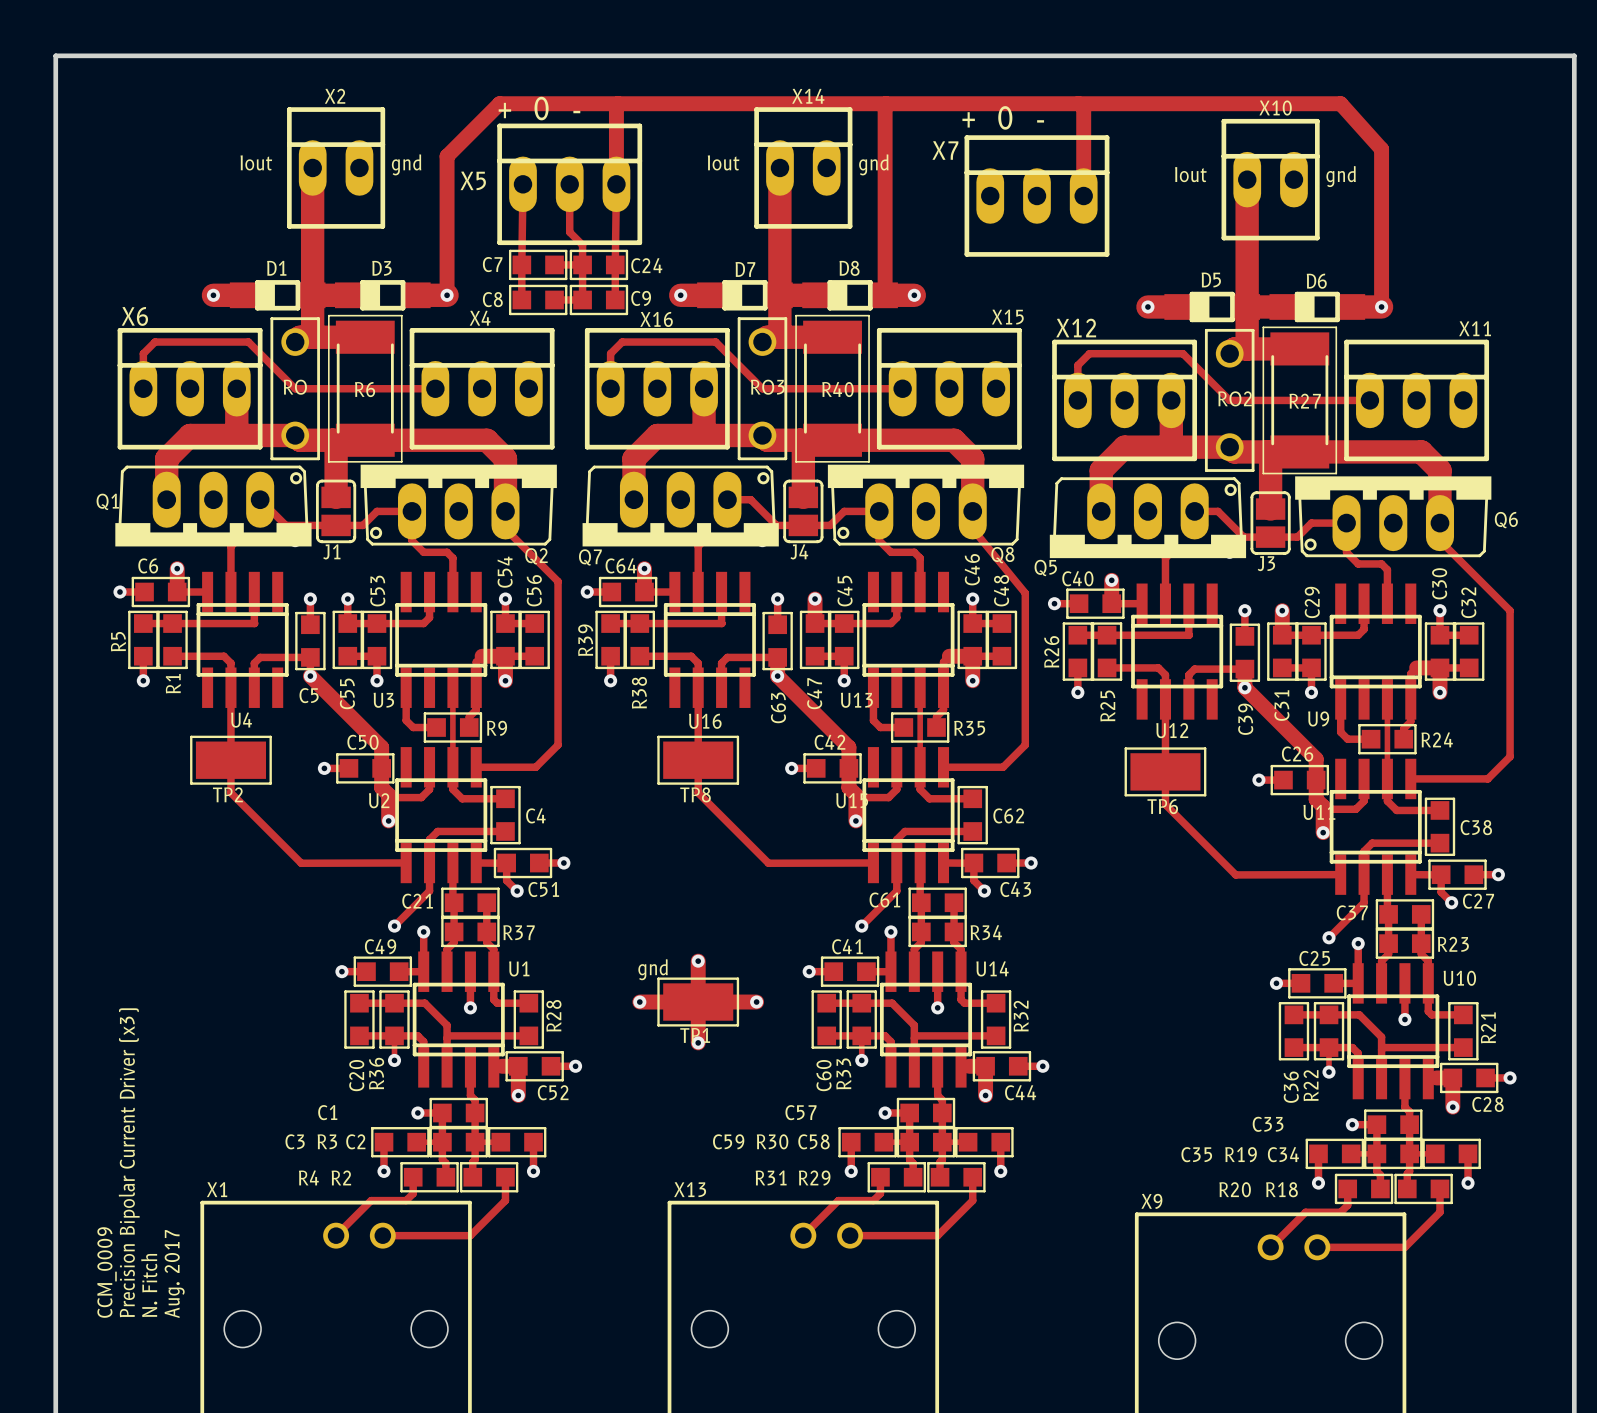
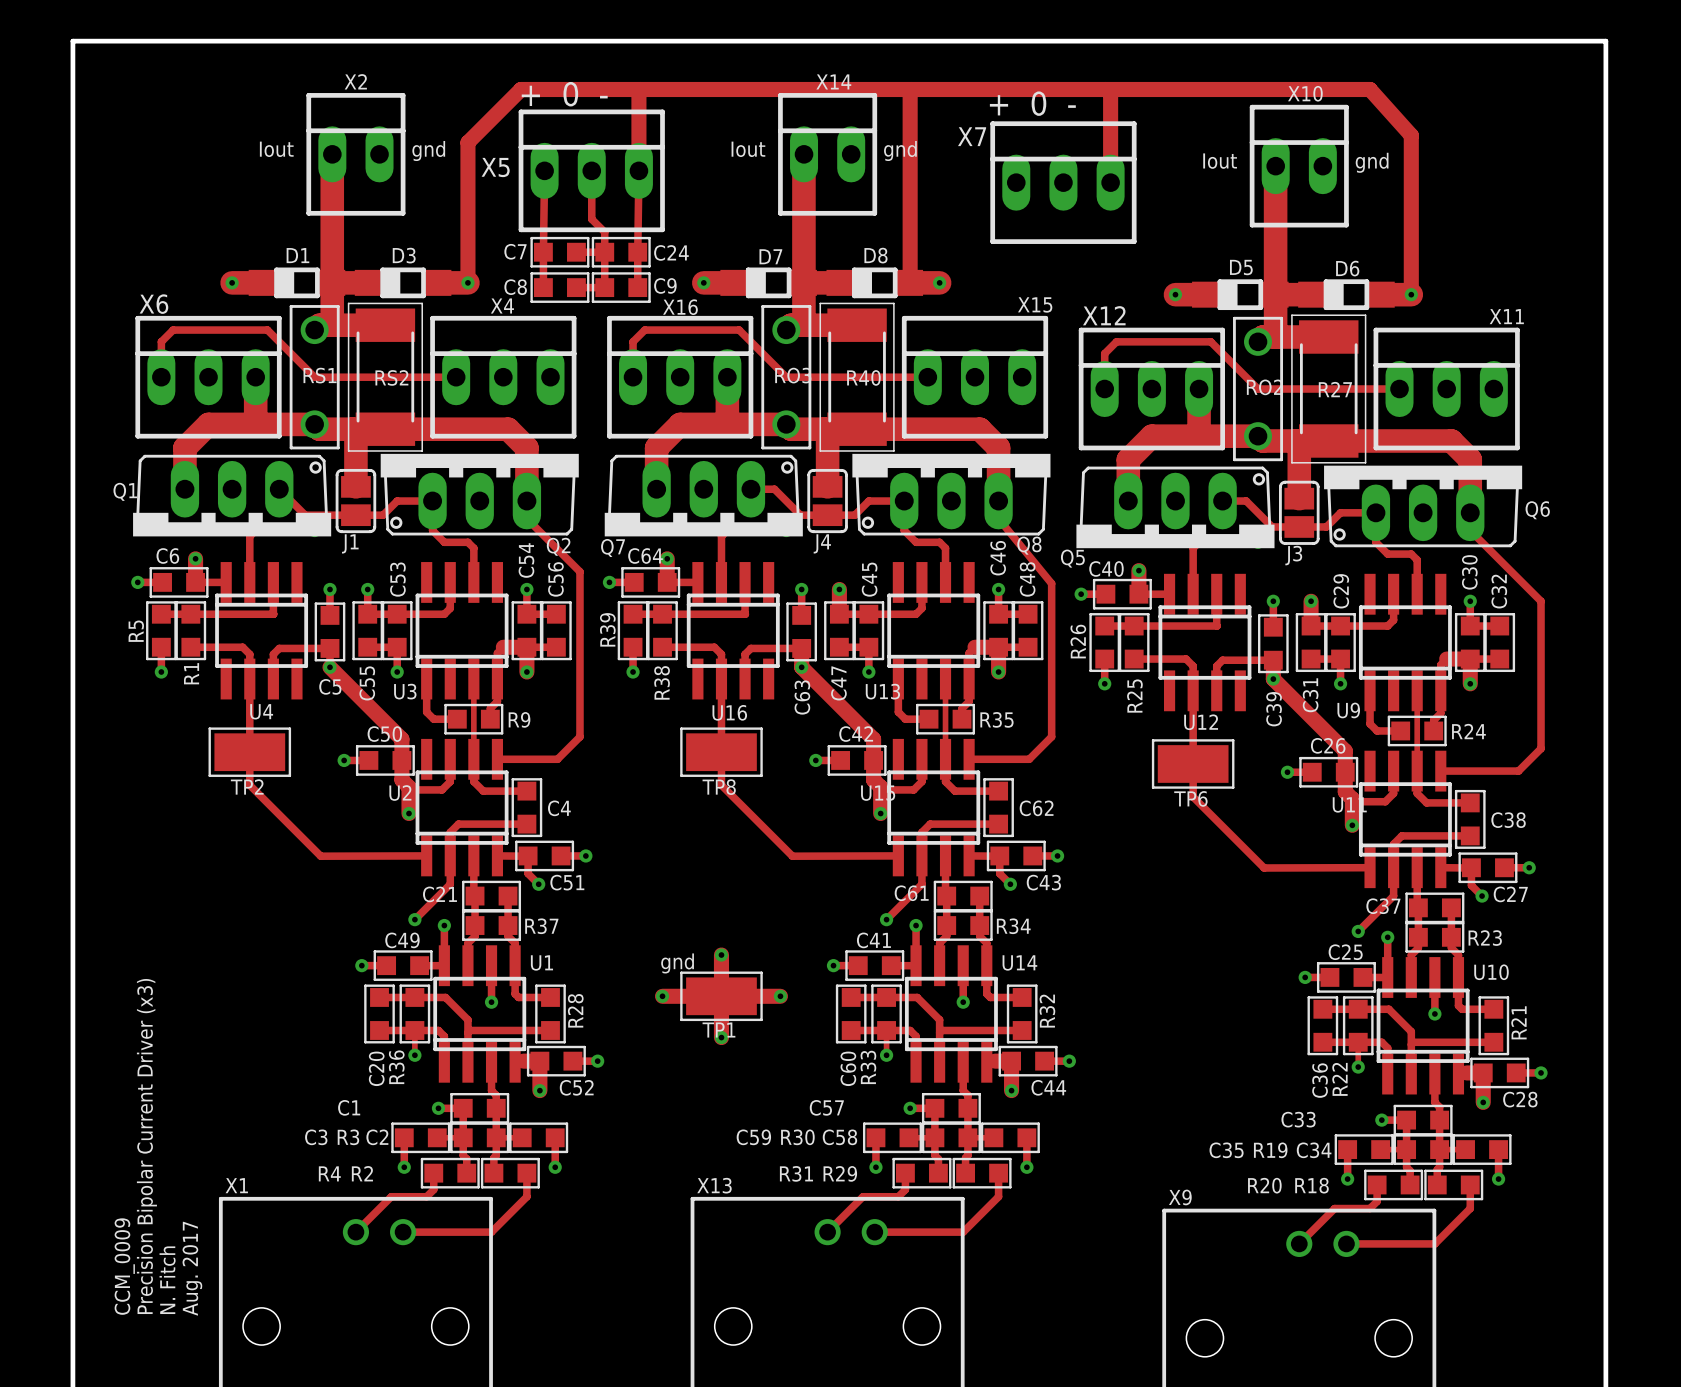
RO name: RO (295, 387) -> RS1 (320, 375)
R6 name: R6 (365, 389) -> RS2 (391, 377)

